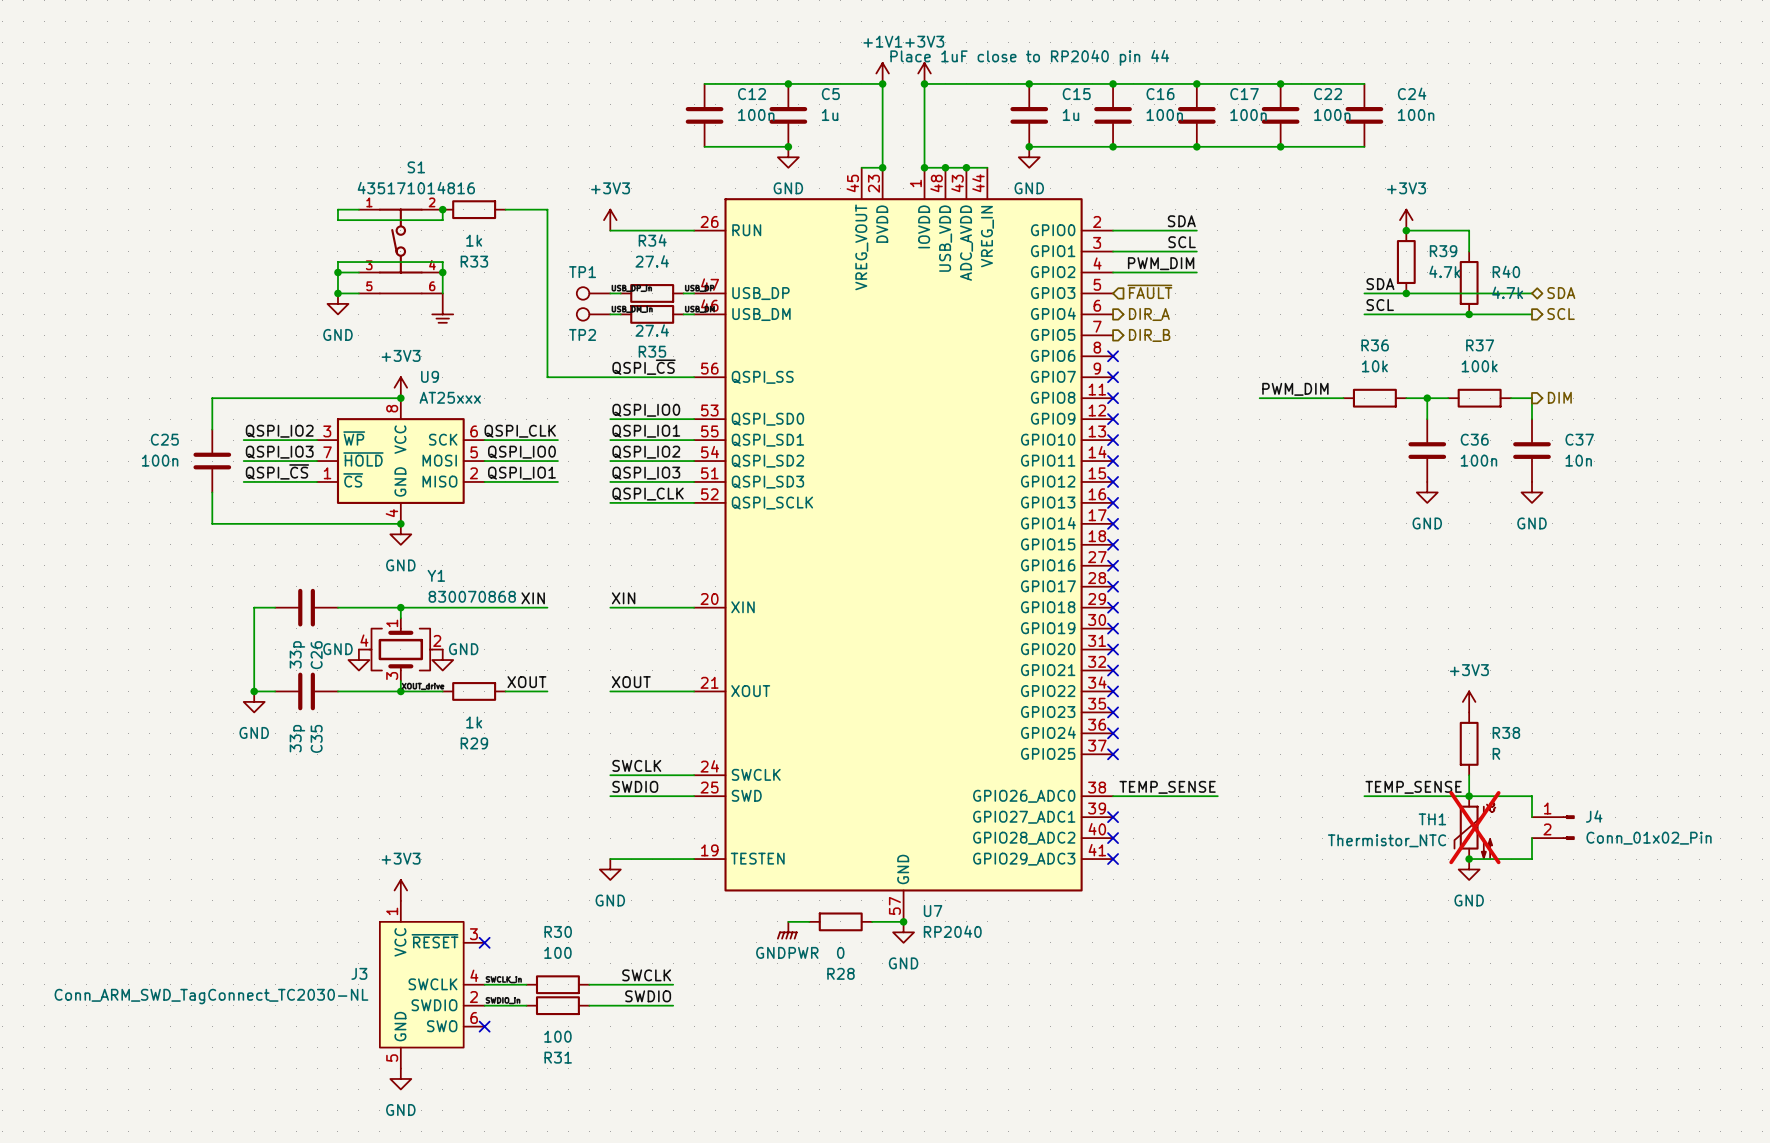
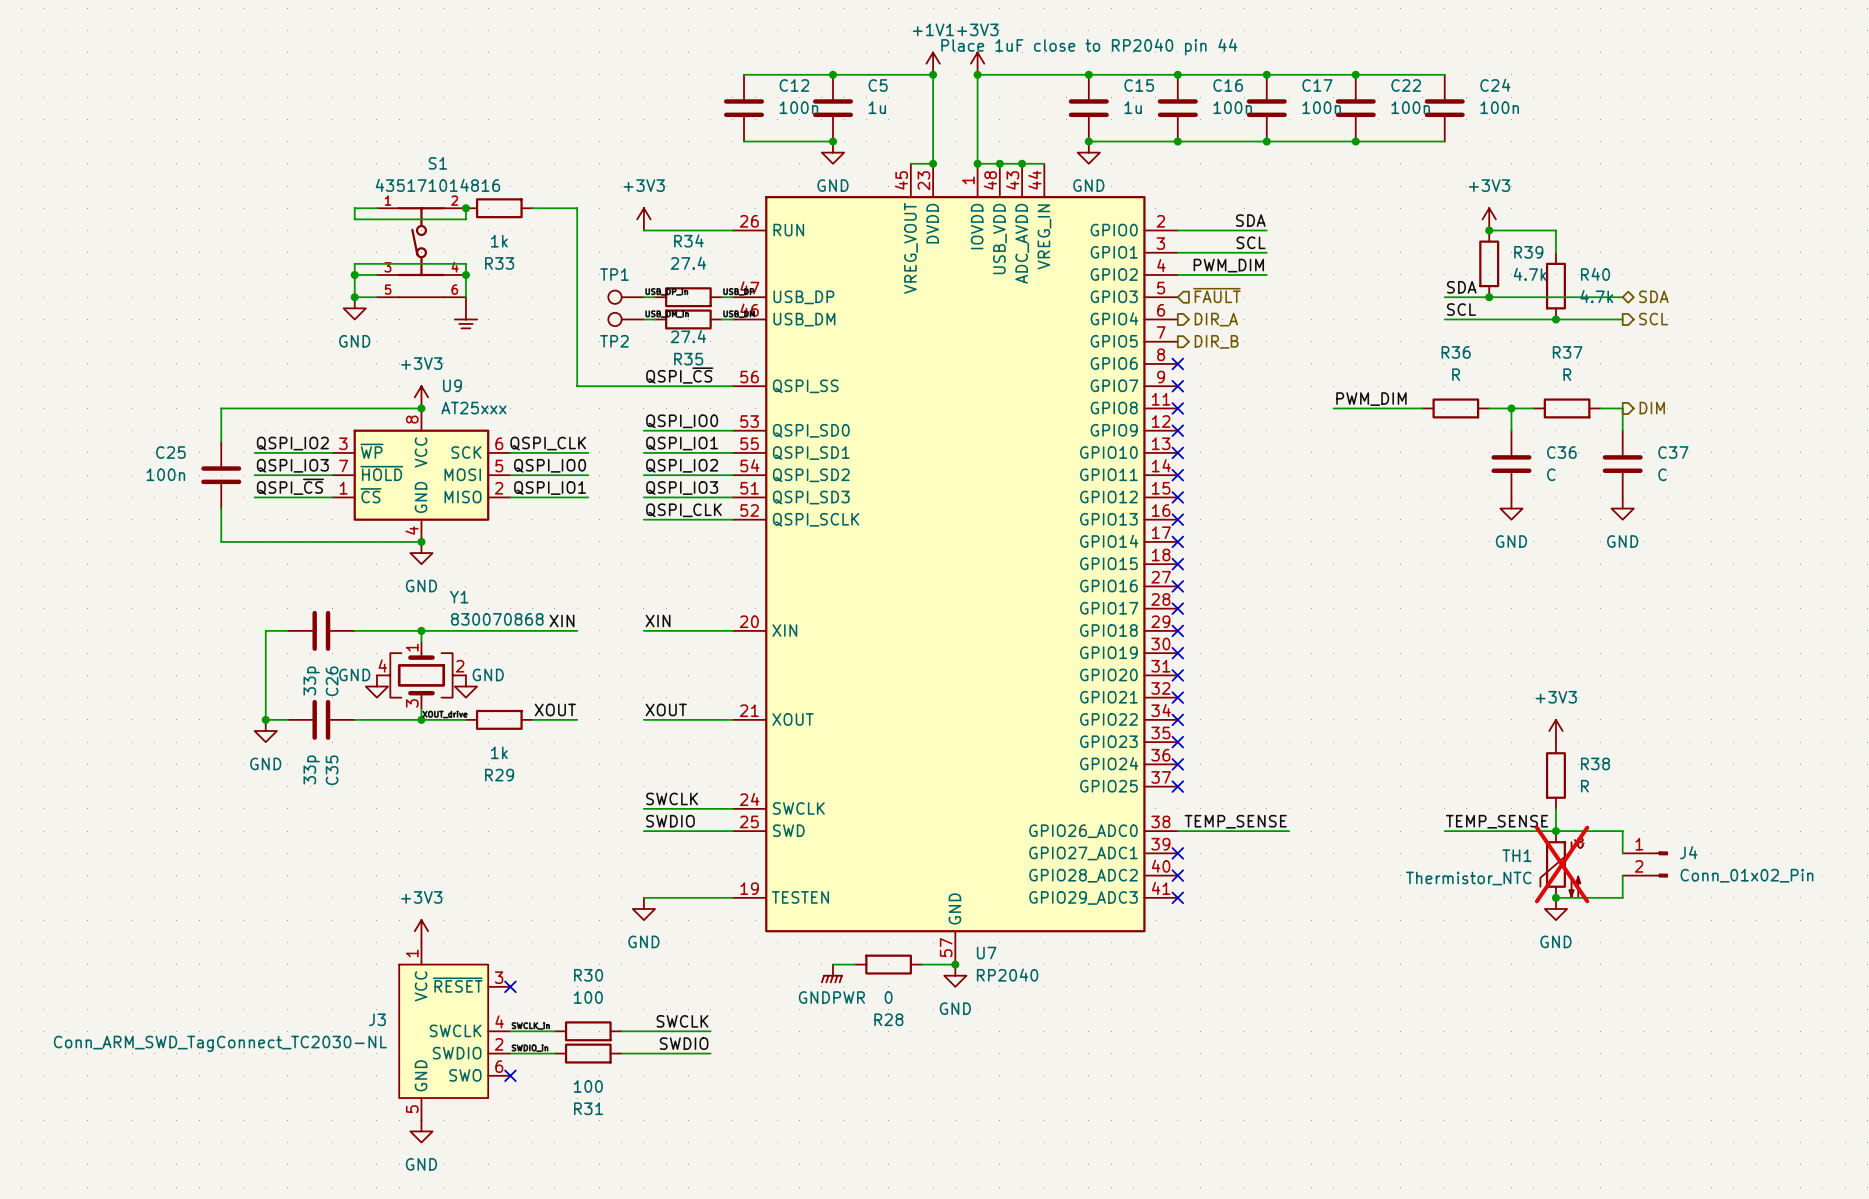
R36 value: 10k (1374, 366) -> R (1456, 374)
R37 value: 100k (1479, 366) -> R (1567, 374)
C36 value: 100n (1478, 460) -> C (1551, 474)
C37 value: 10n (1578, 460) -> C (1662, 474)

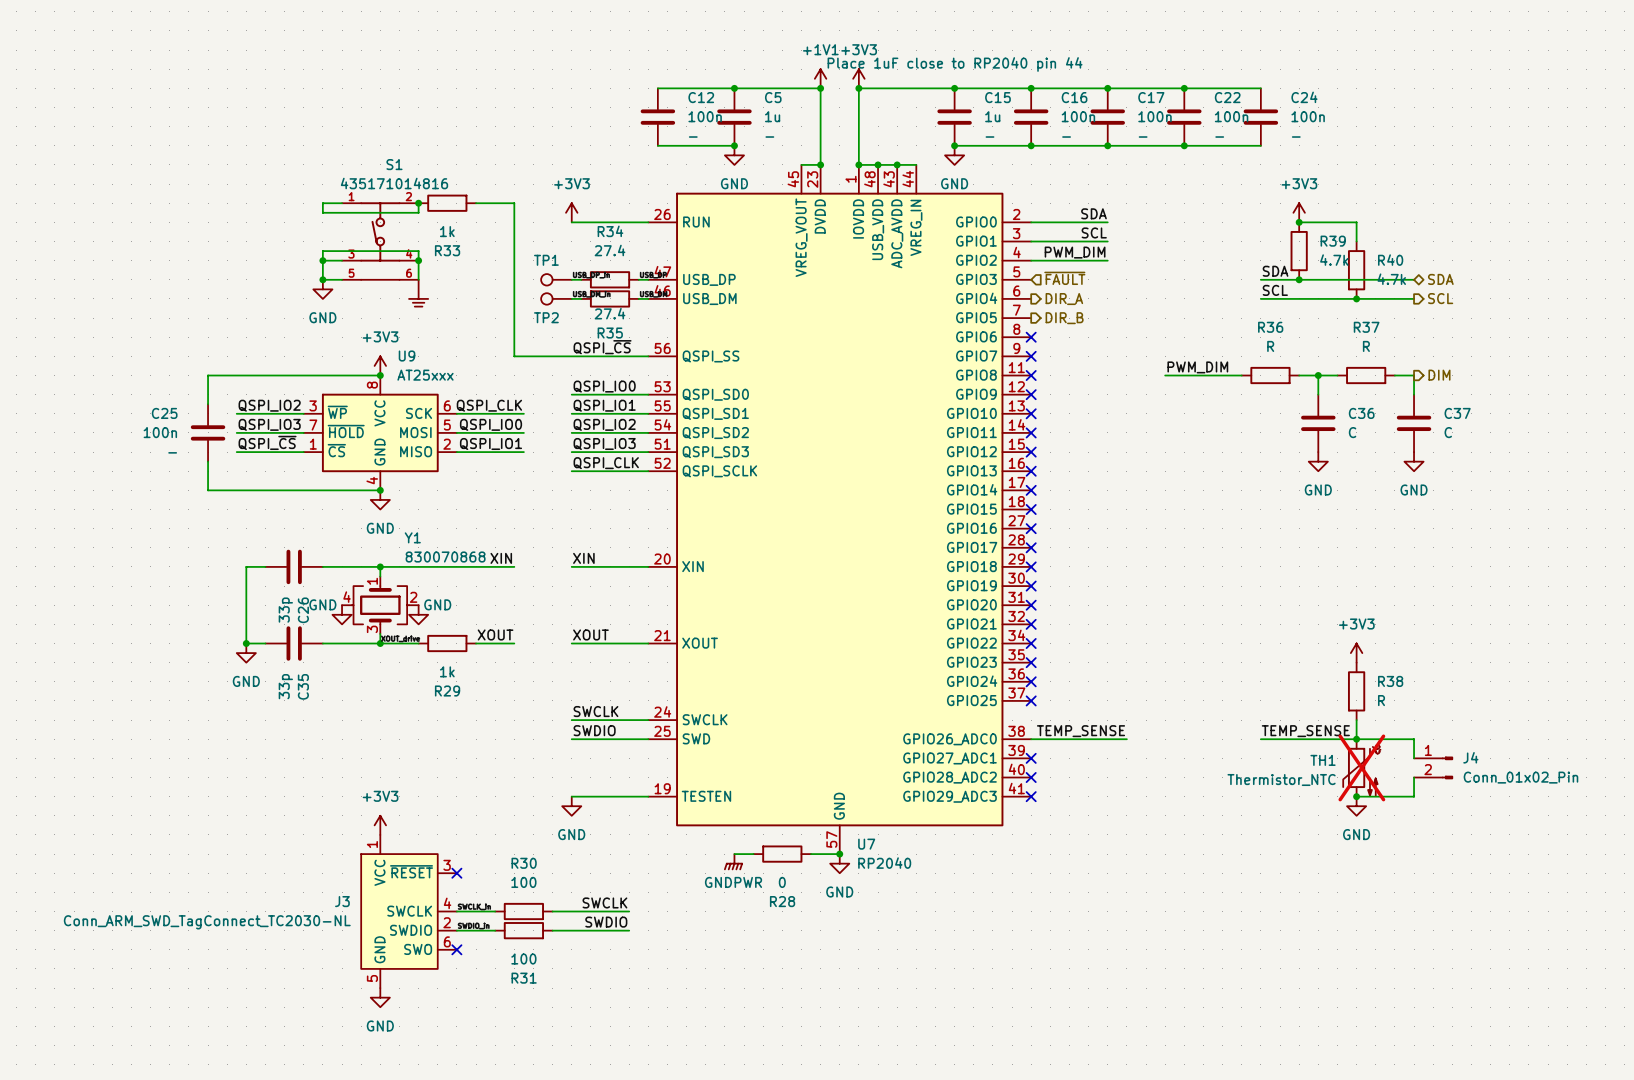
C12 text: none -> - (693, 137)
C5 text: none -> - (769, 137)
C15 text: none -> - (989, 137)
C16 text: none -> - (1066, 137)
C17 text: none -> - (1143, 137)
C22 text: none -> - (1219, 137)
C24 text: none -> - (1296, 137)
C25 text: none -> - (172, 452)

